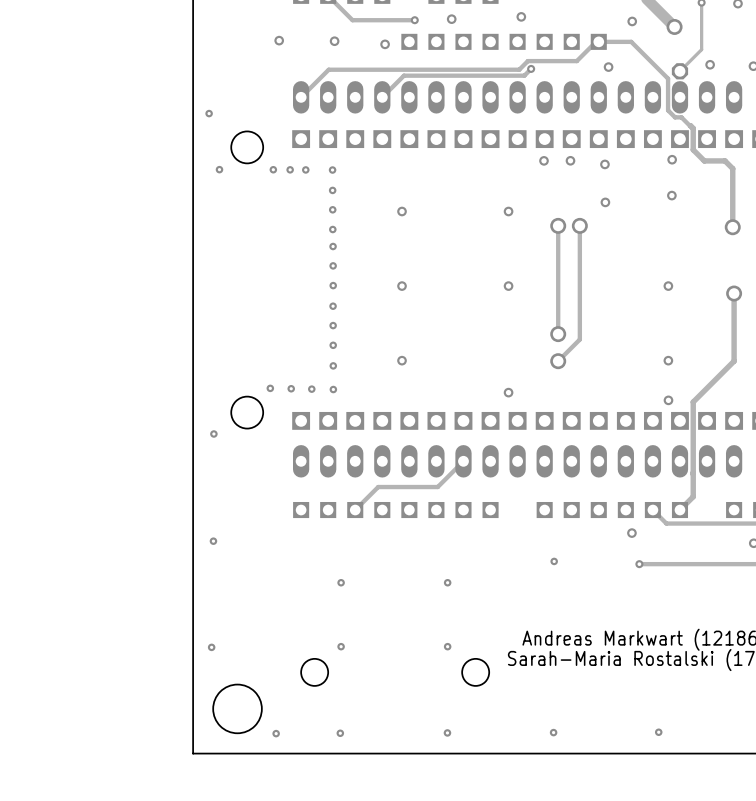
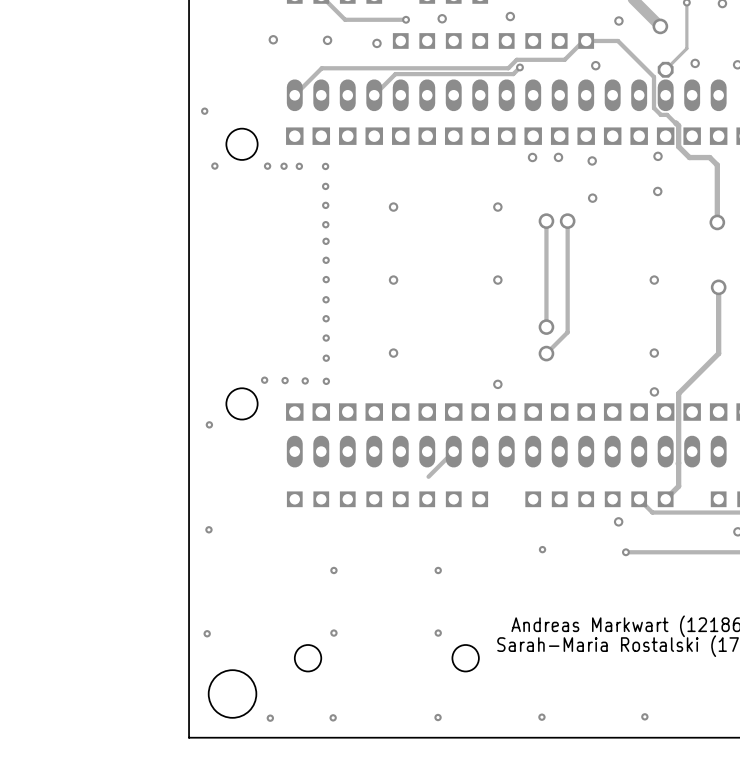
track: (437, 487) (378, 487) (355, 510) -> none

